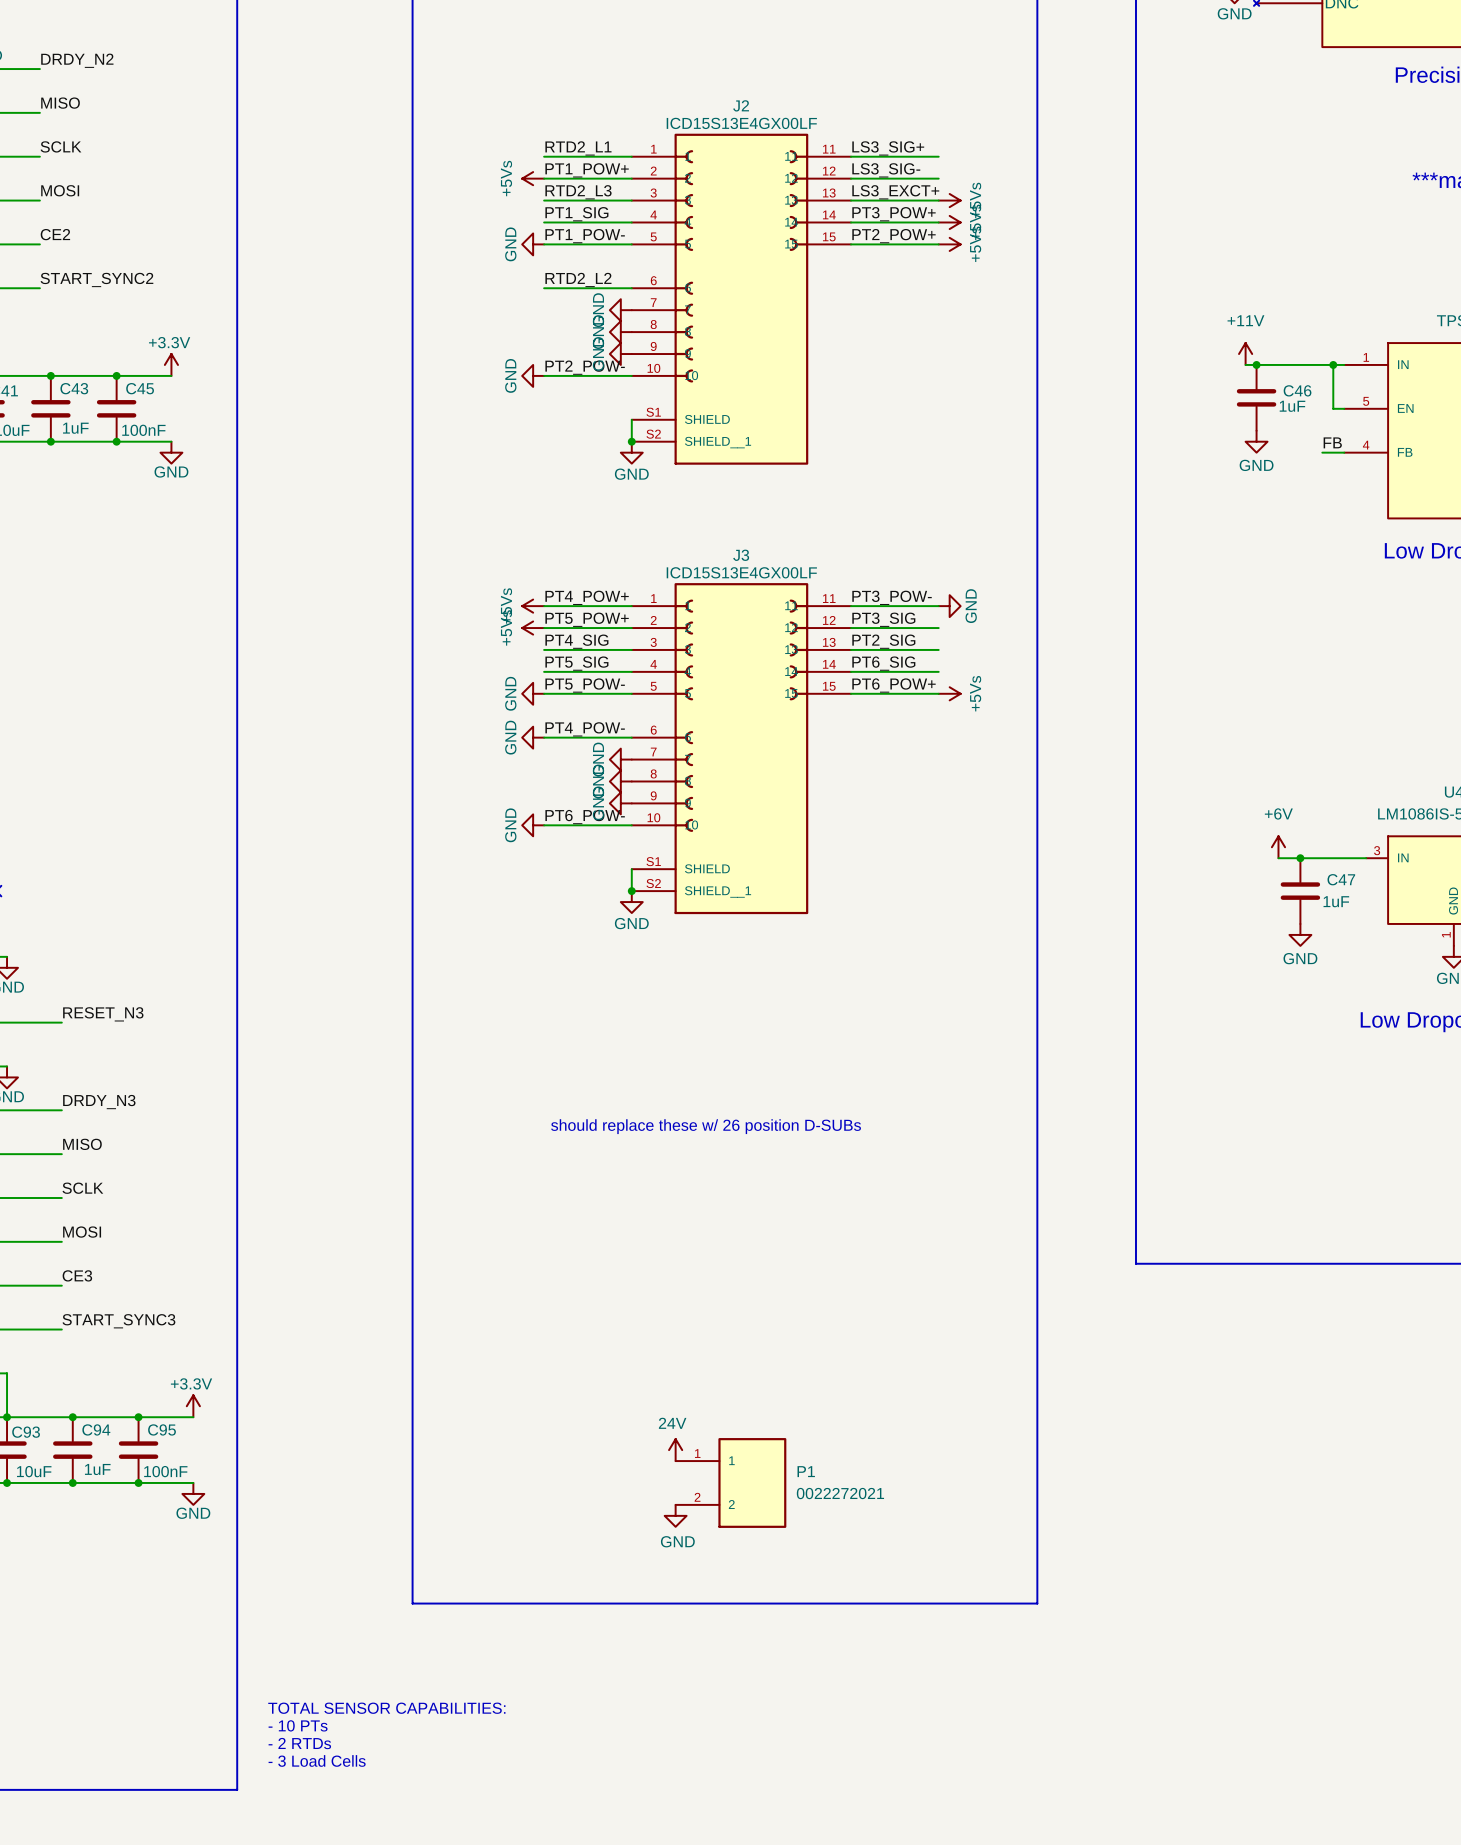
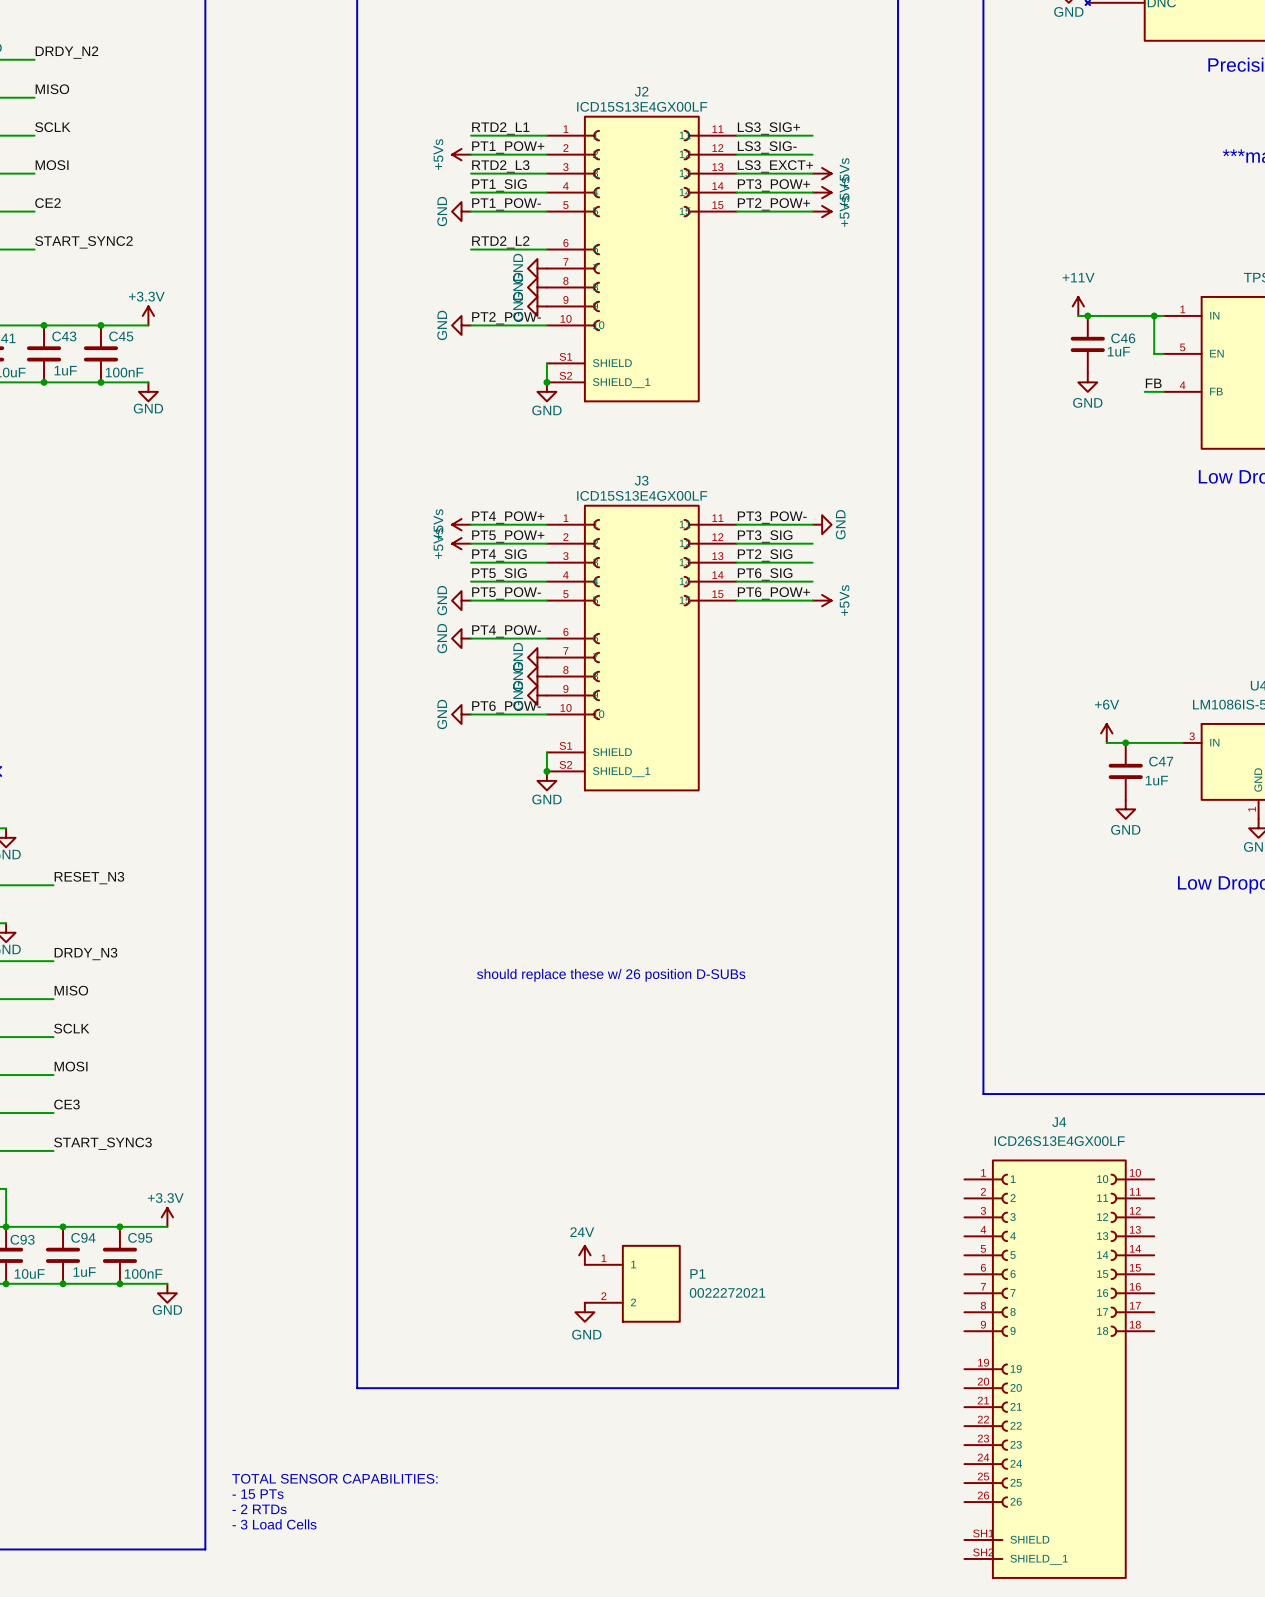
J4: none -> ICD26S13E4GX00LF (1059, 1369)
text: - 10 PTs (298, 1725) -> - 15 PTs (258, 1494)

